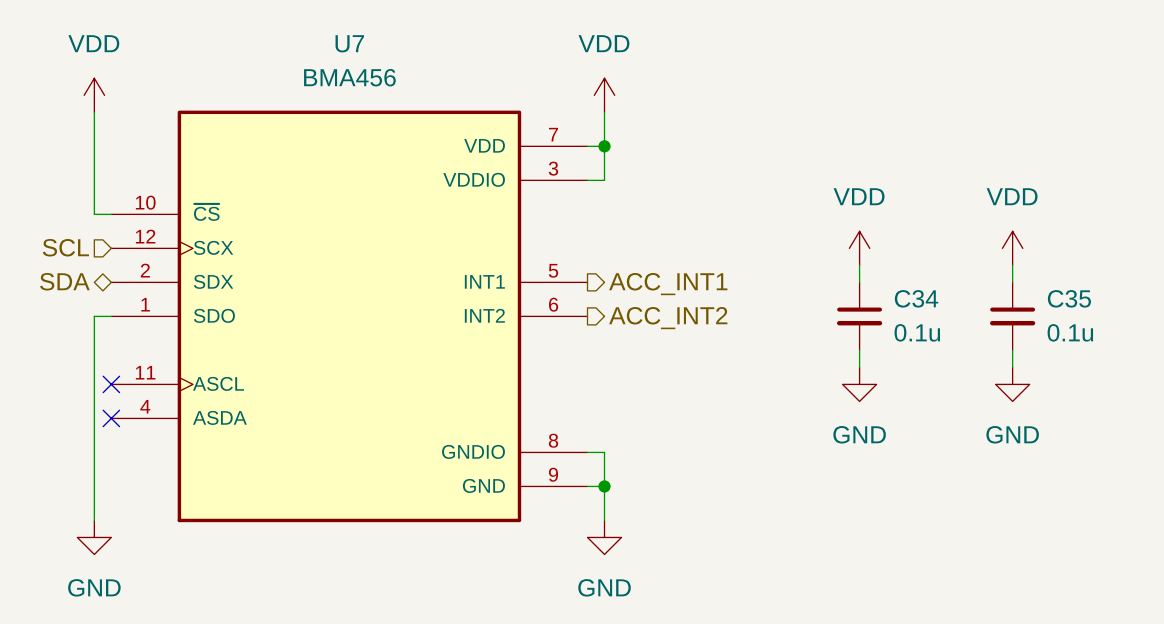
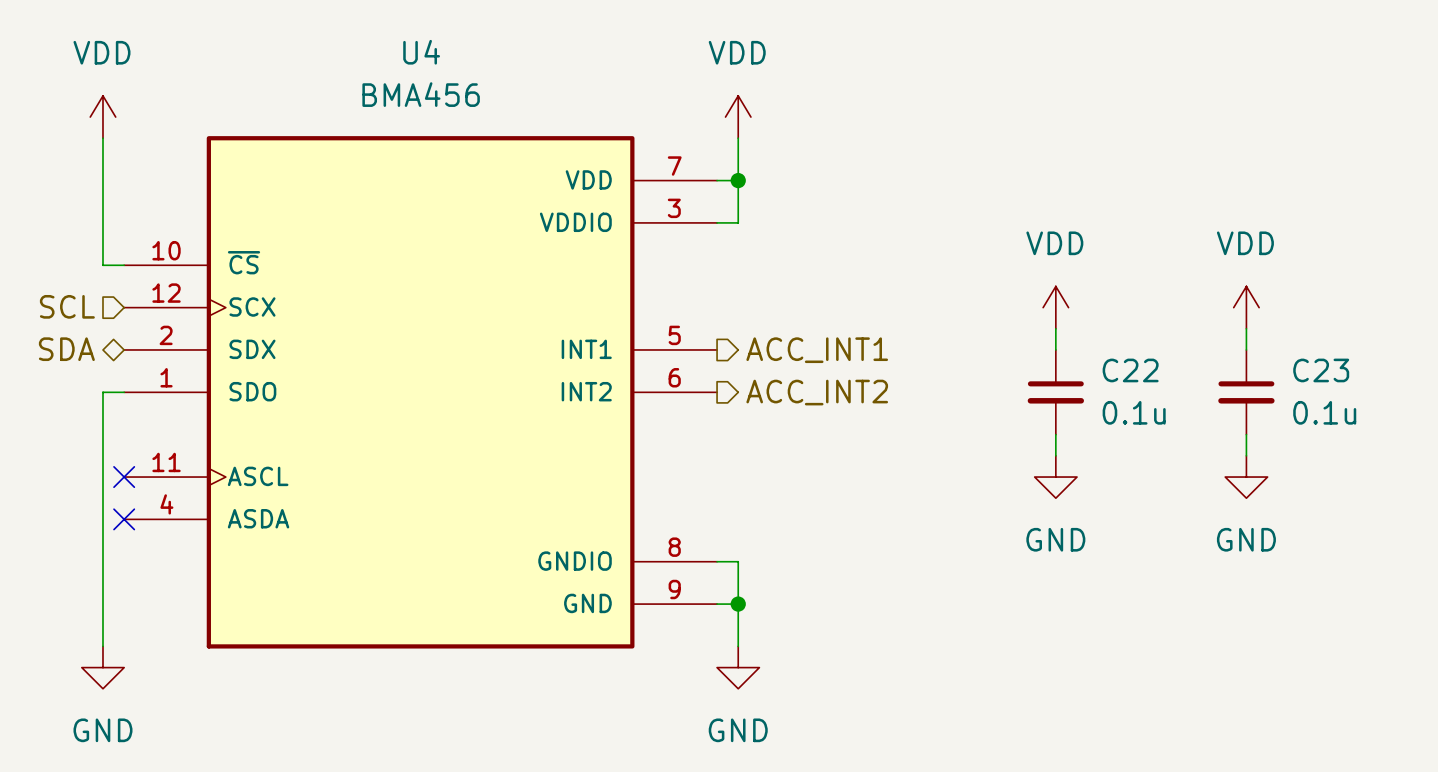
U7 name: U7 (349, 43) -> U4 (421, 52)
C34 name: C34 (916, 298) -> C22 (1130, 370)
C35 name: C35 (1069, 298) -> C23 (1321, 370)

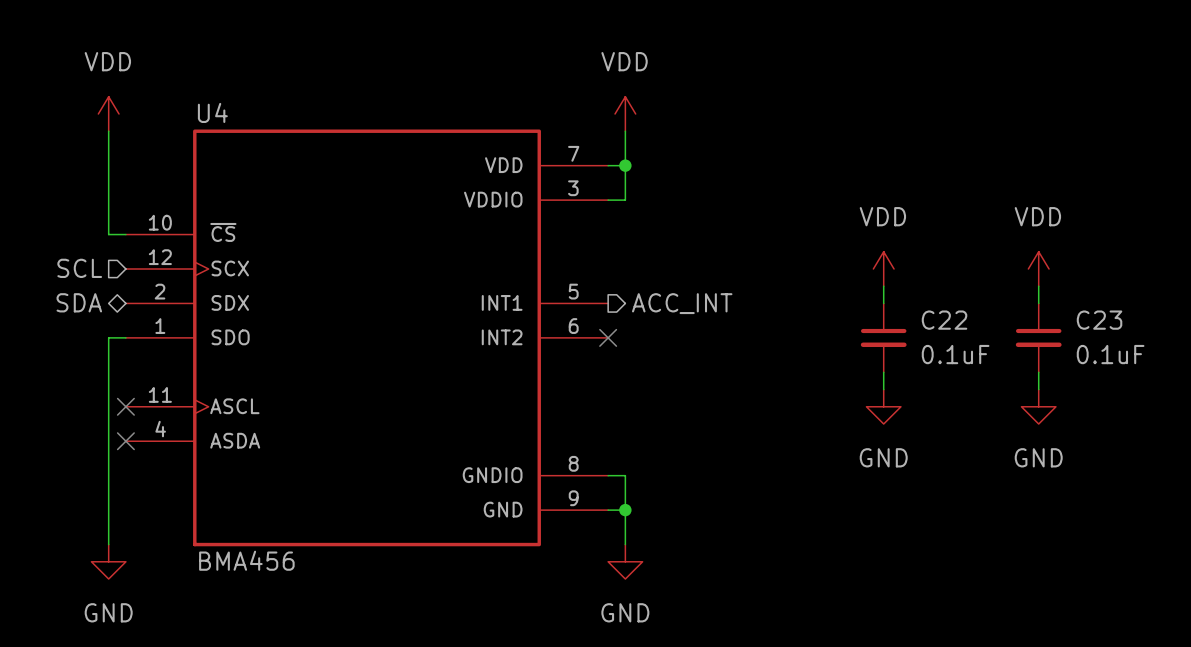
U4 name position: U4 (421, 52) -> U4 (212, 112)
U4 value position: BMA456 (421, 94) -> BMA456 (246, 560)
hierarchical label: ACC_INT1 (817, 350) -> ACC_INT (682, 303)
no-connect mark: none -> (608, 337)
hierarchical label: ACC_INT2 (817, 392) -> none
C22 value: 0.1u (1134, 412) -> 0.1uF (955, 354)
C23 value: 0.1u (1324, 412) -> 0.1uF (1110, 354)

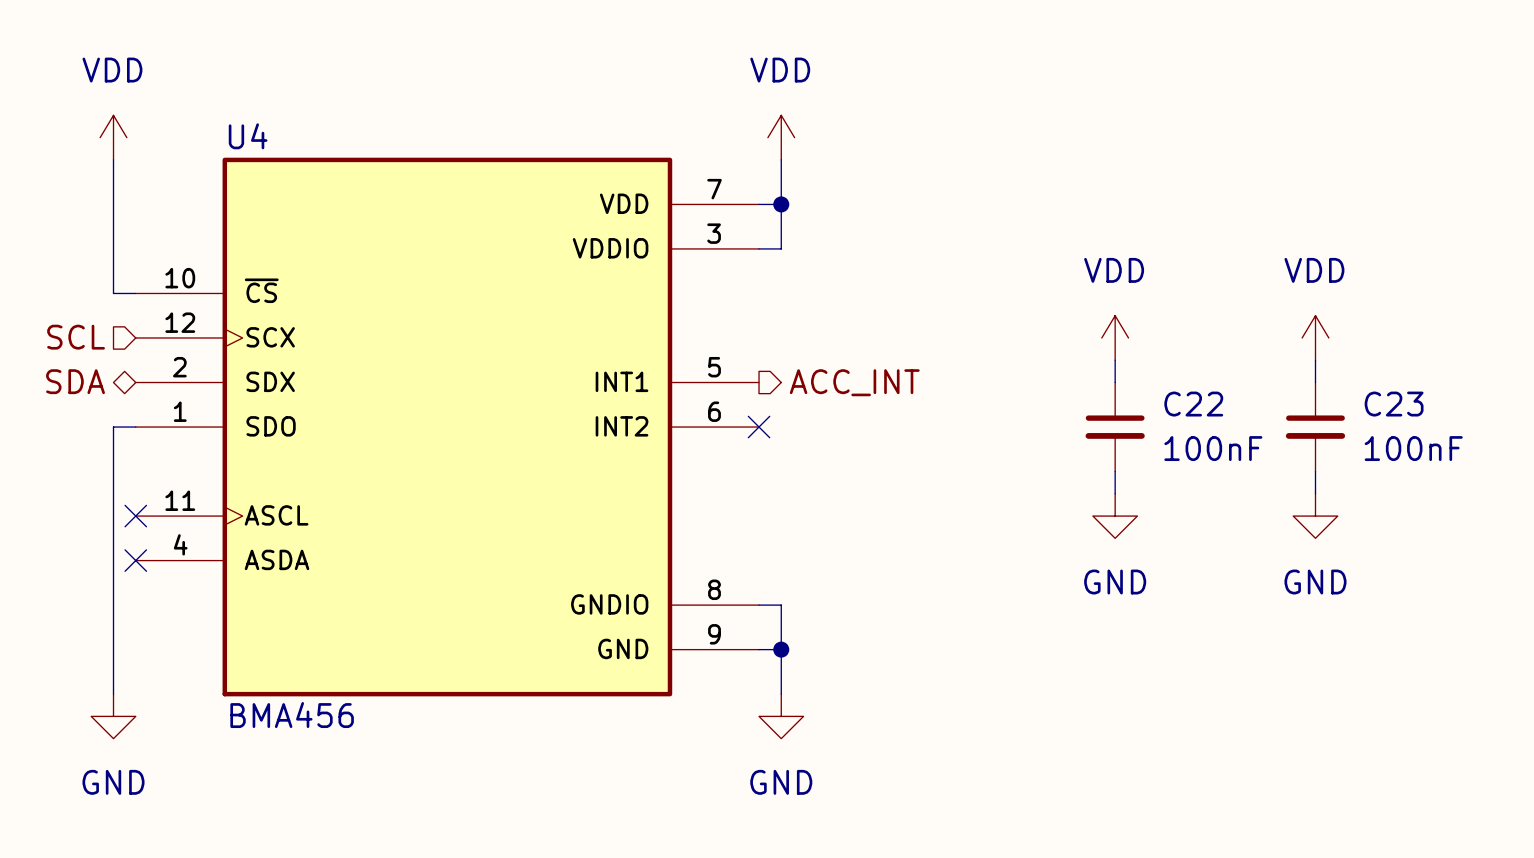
C22 value: 0.1uF (955, 354) -> 100nF (1213, 448)
C23 value: 0.1uF (1110, 354) -> 100nF (1413, 448)

